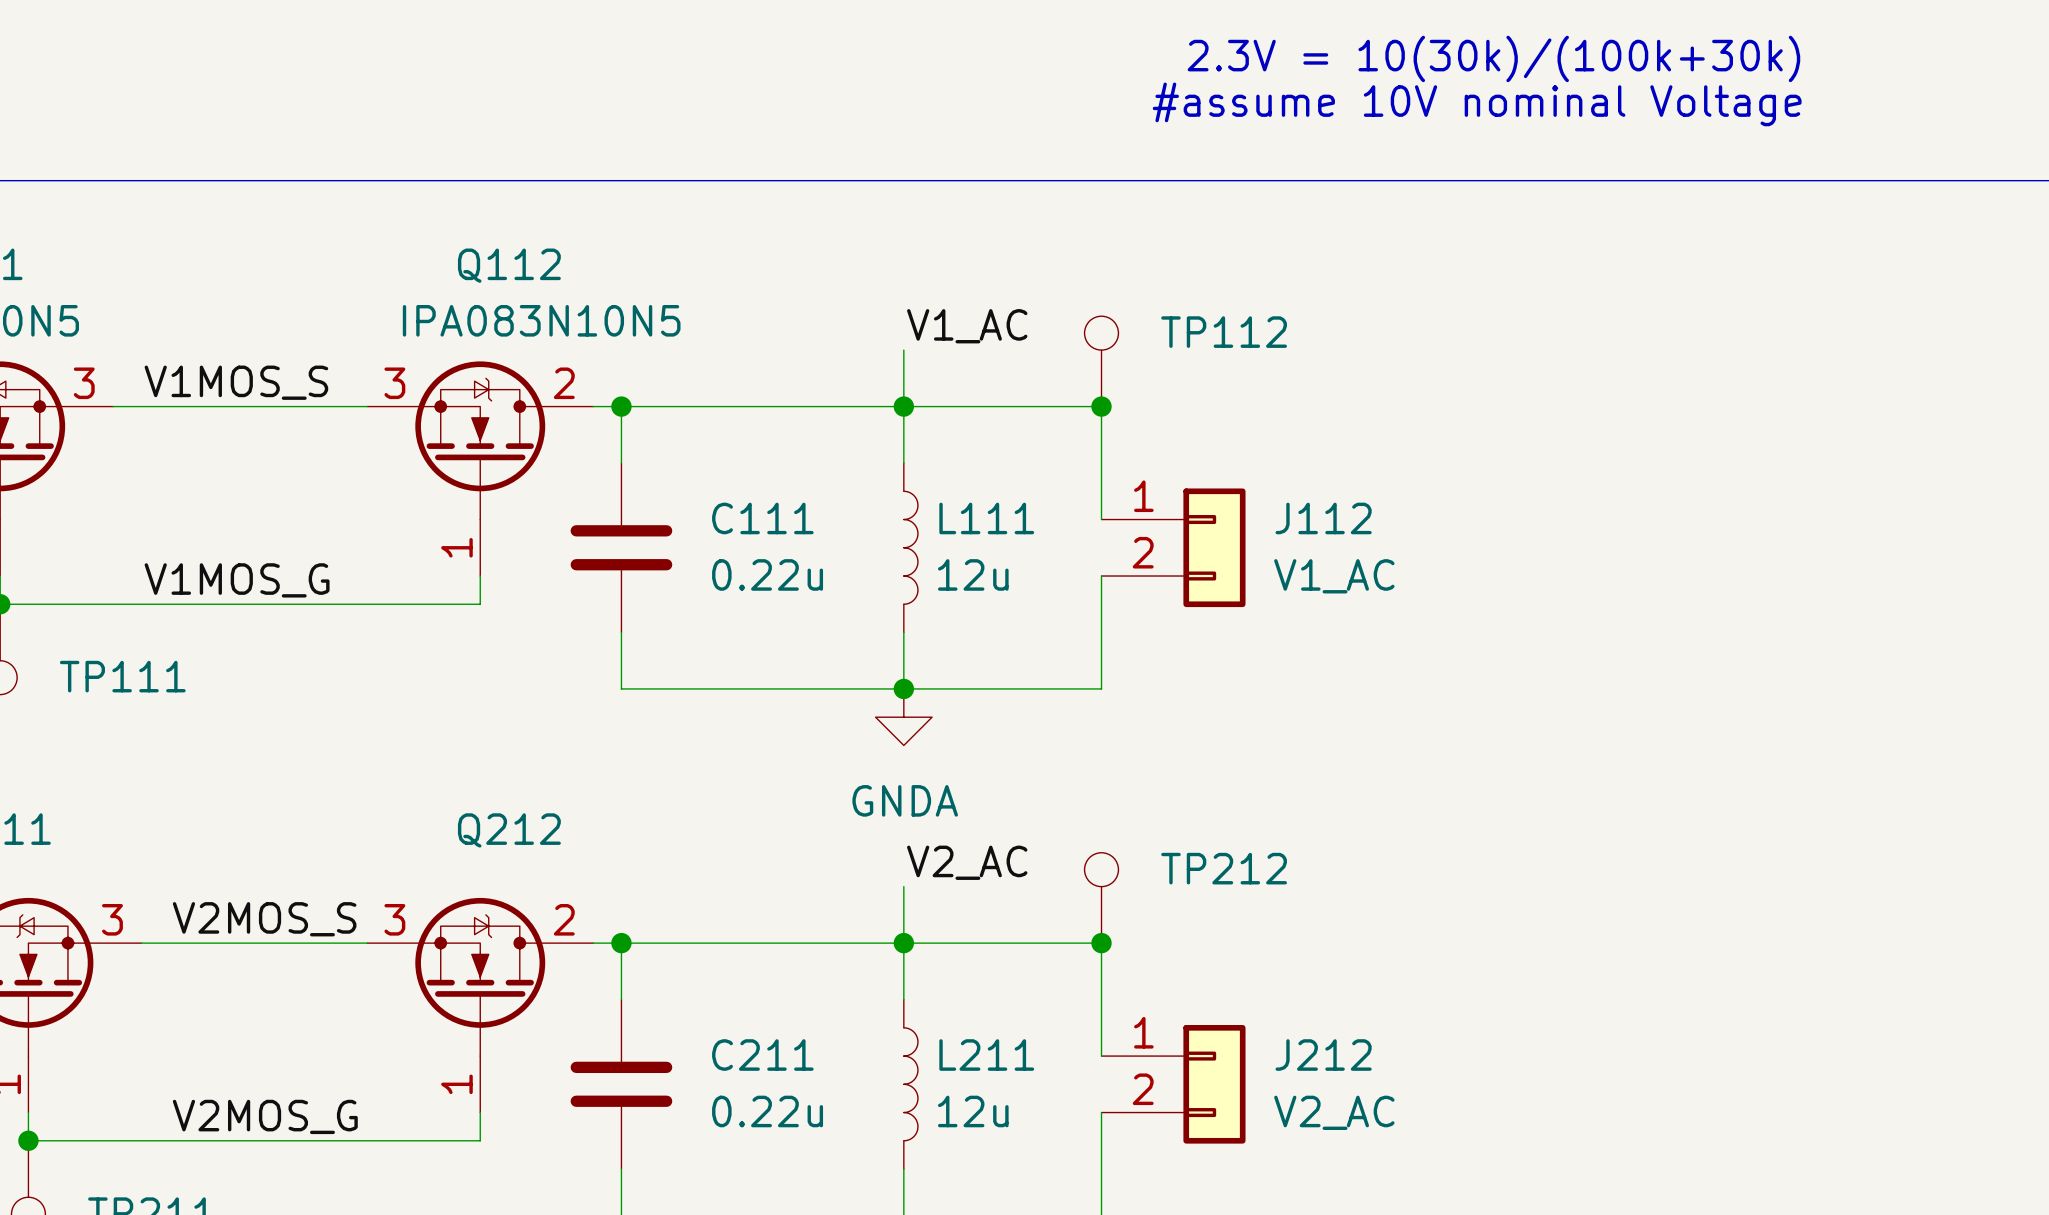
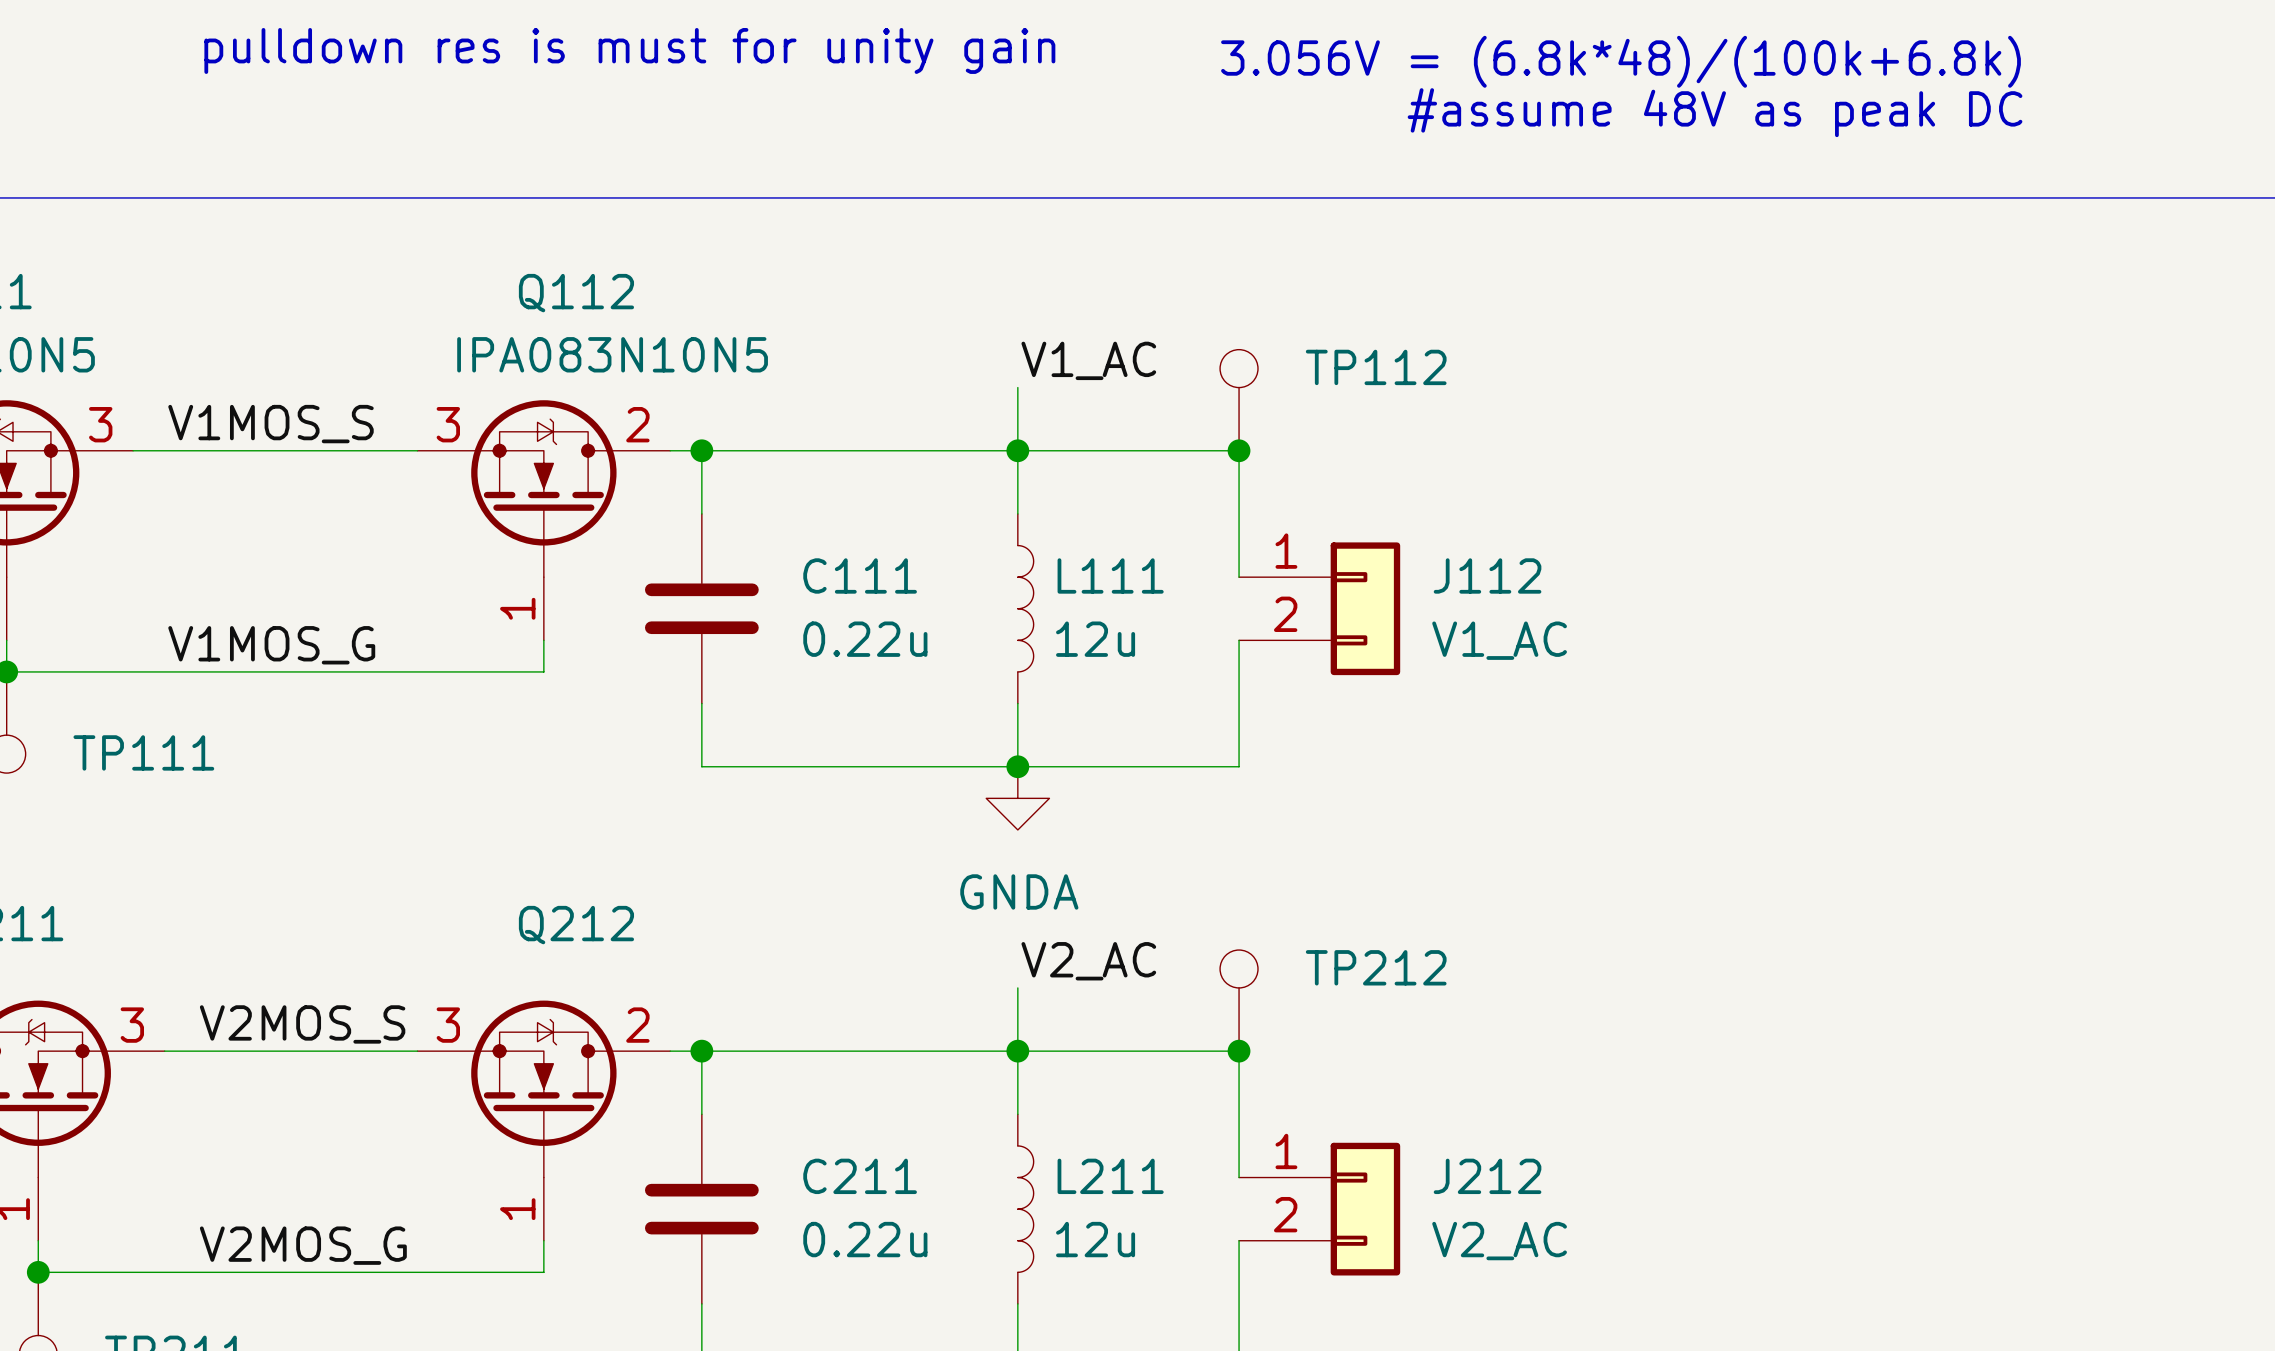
text: none -> pulldown res is must for unity gain (629, 50)
text: 2.3V = 10(30k)/(100k+30k) (1493, 58) -> 3.056V = (6.8k*48)/(100k+6.8k) (1620, 61)
text: #assume 10V nominal Voltage (1477, 104) -> #assume 48V as peak DC (1715, 112)

